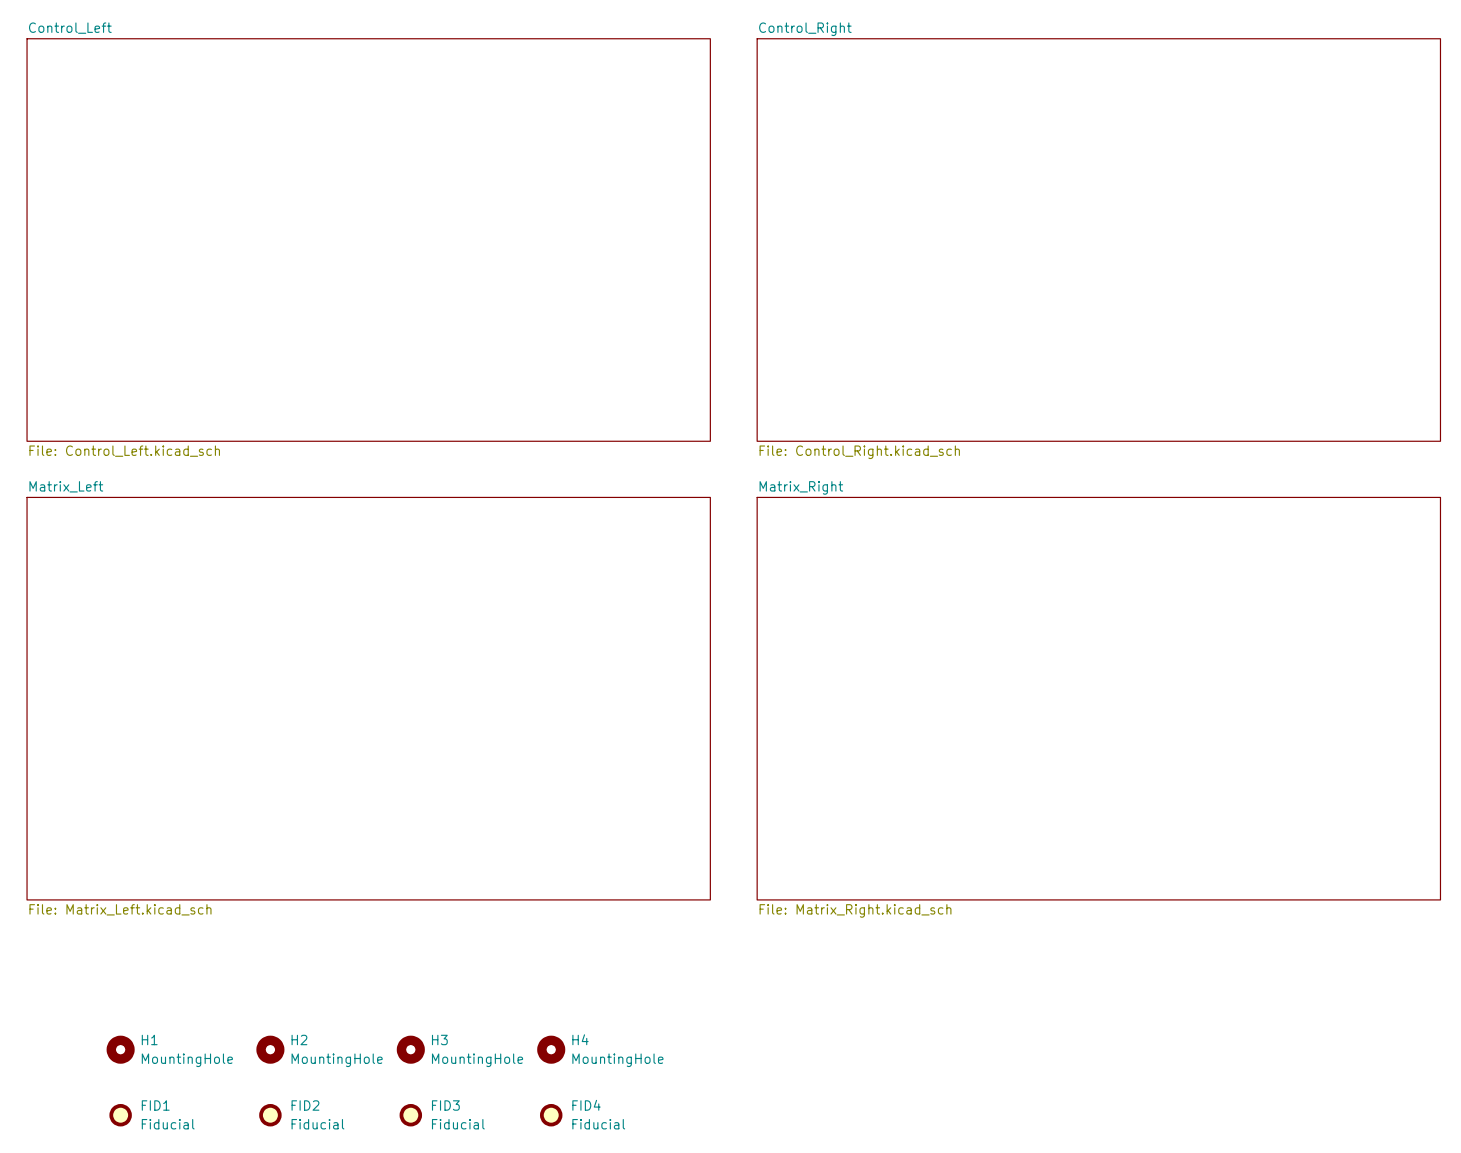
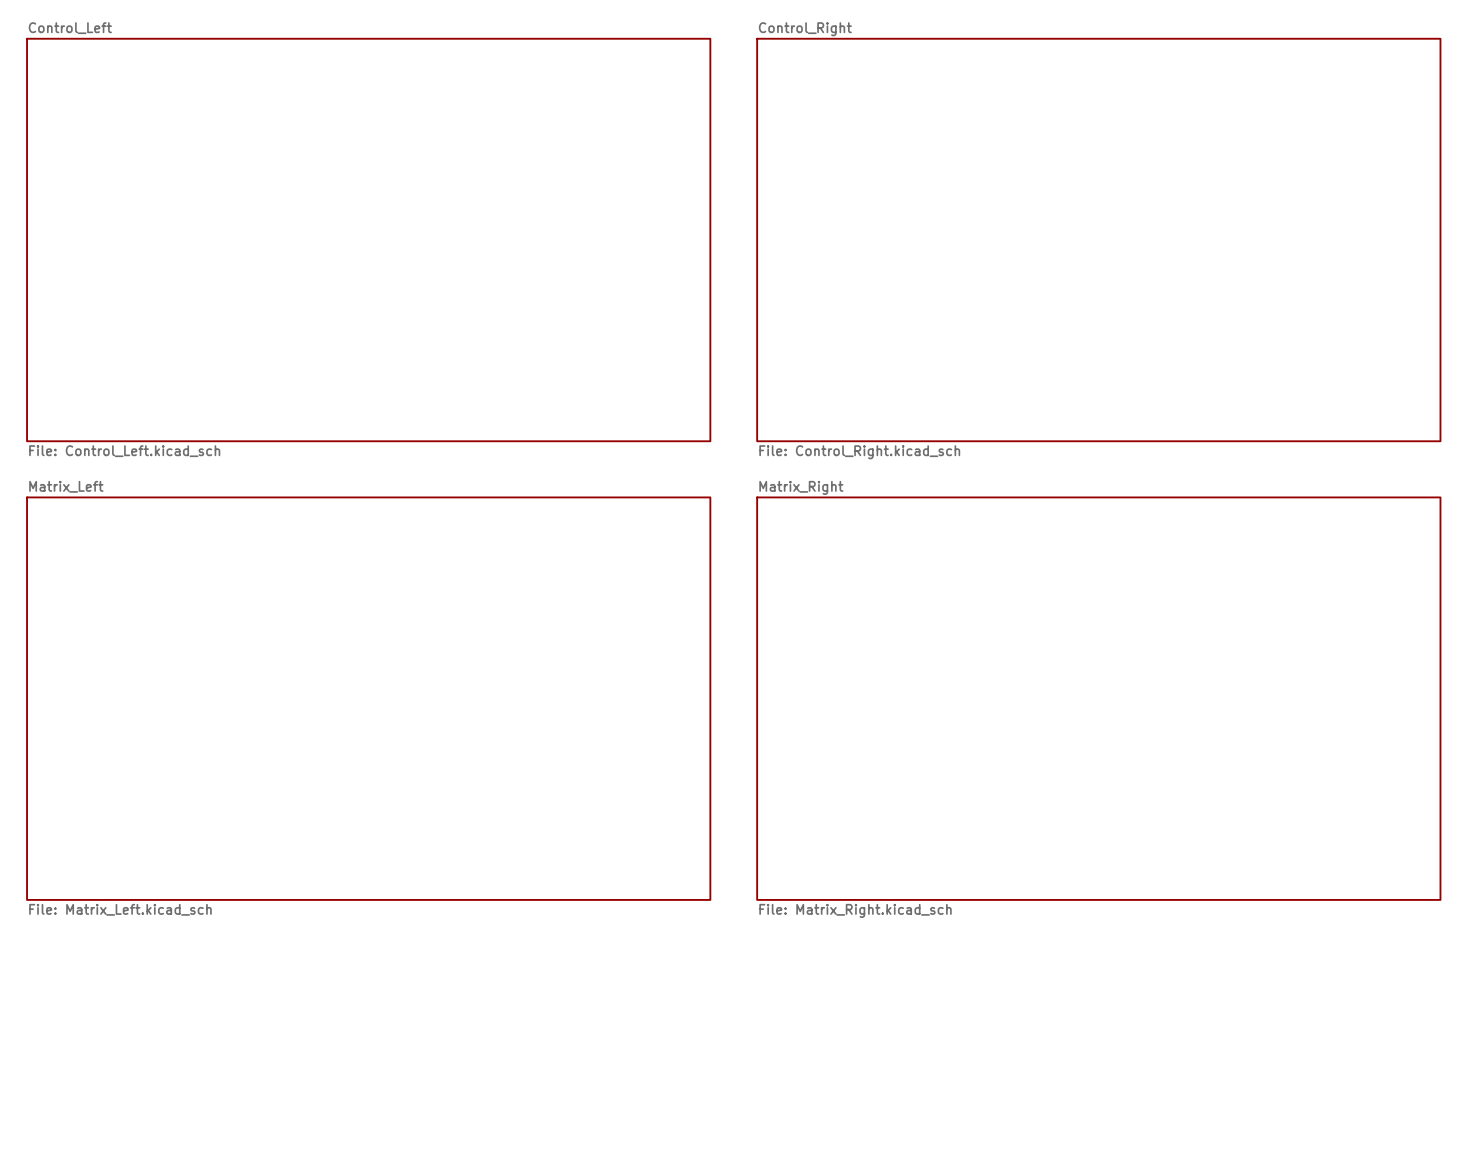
H1: MountingHole (120, 1049) -> none
H2: MountingHole (270, 1049) -> none
H3: MountingHole (410, 1049) -> none
H4: MountingHole (551, 1049) -> none
FID1: Fiducial (120, 1115) -> none
FID2: Fiducial (270, 1115) -> none
FID3: Fiducial (410, 1115) -> none
FID4: Fiducial (551, 1115) -> none

